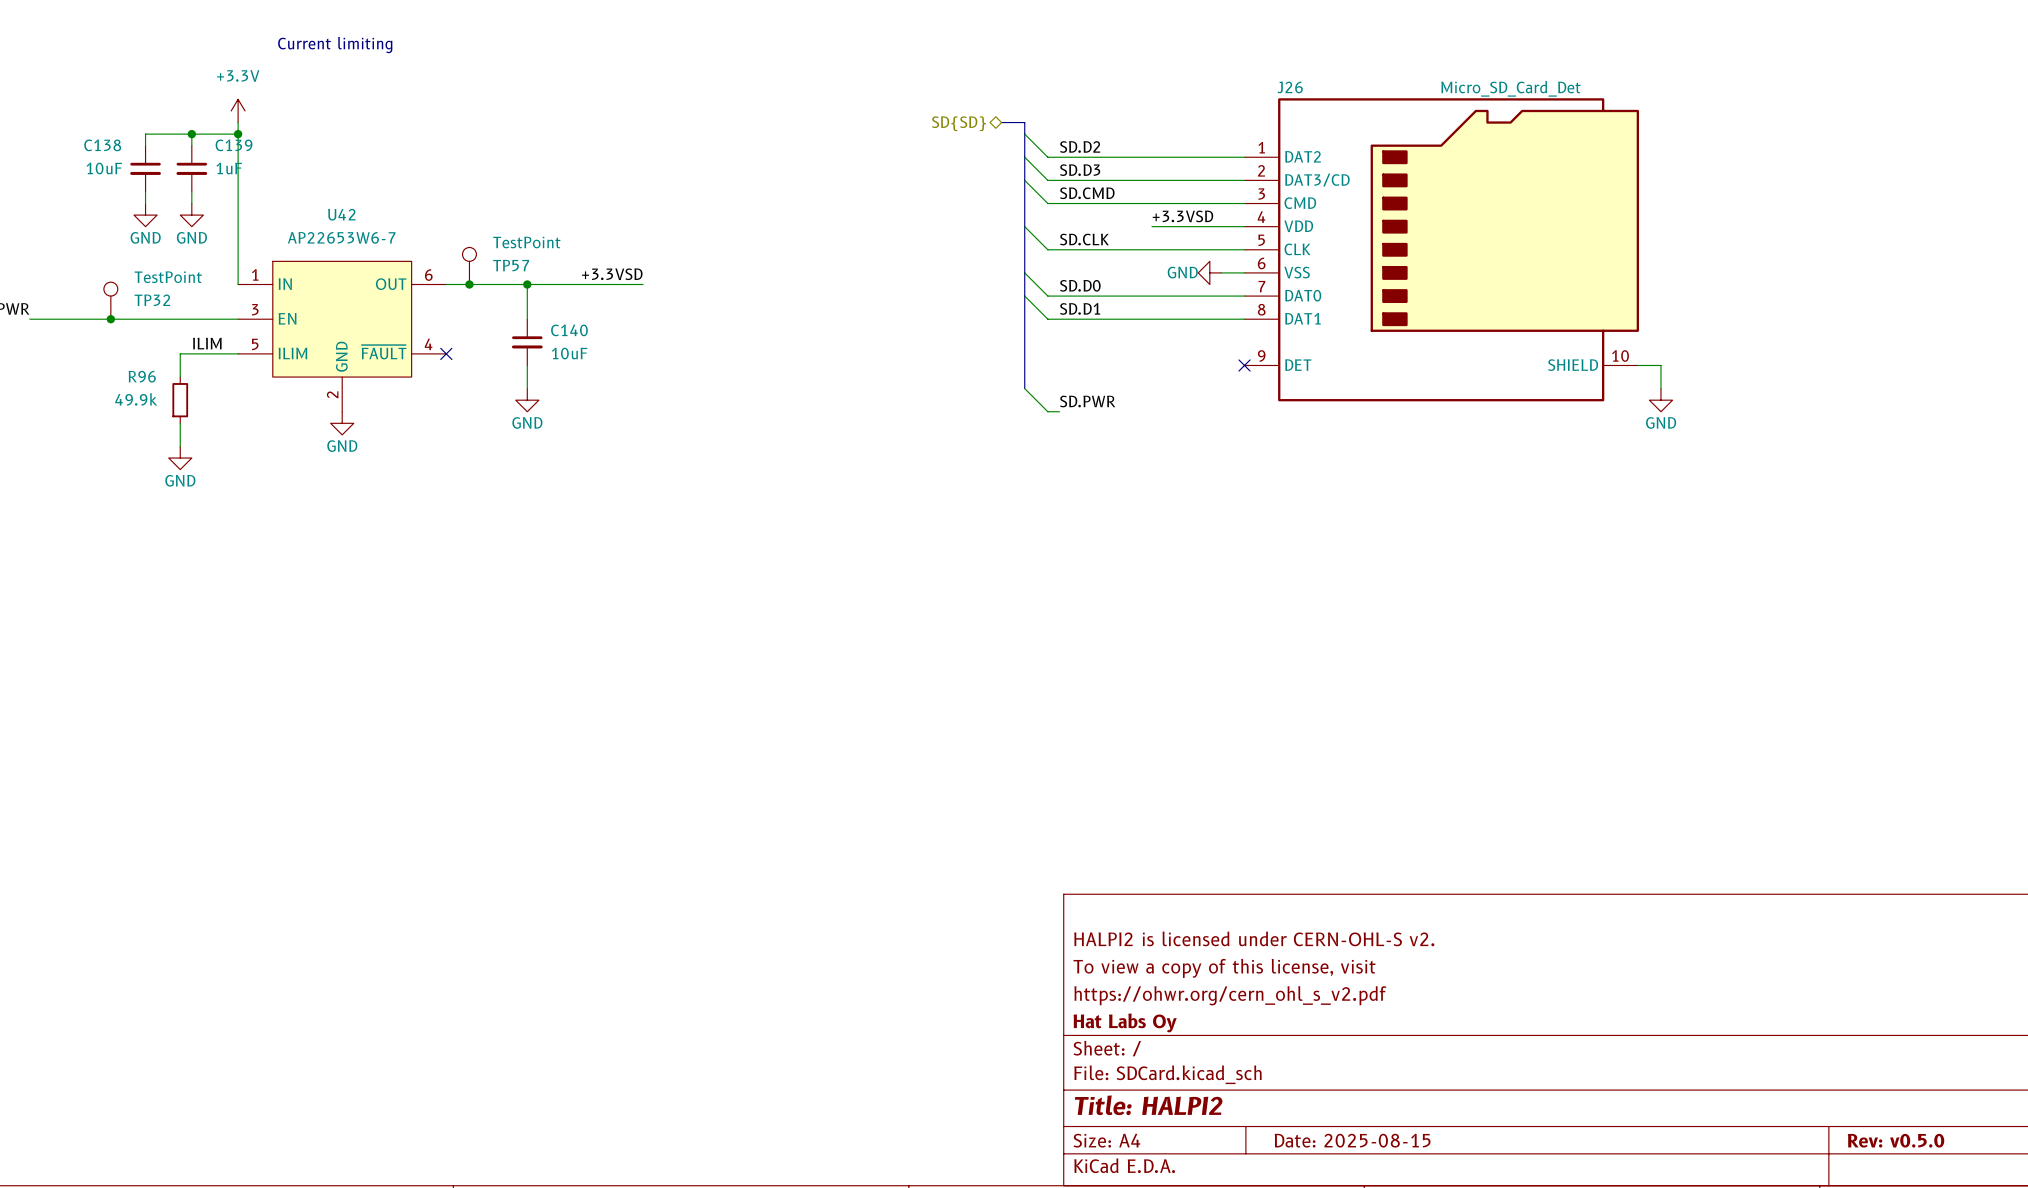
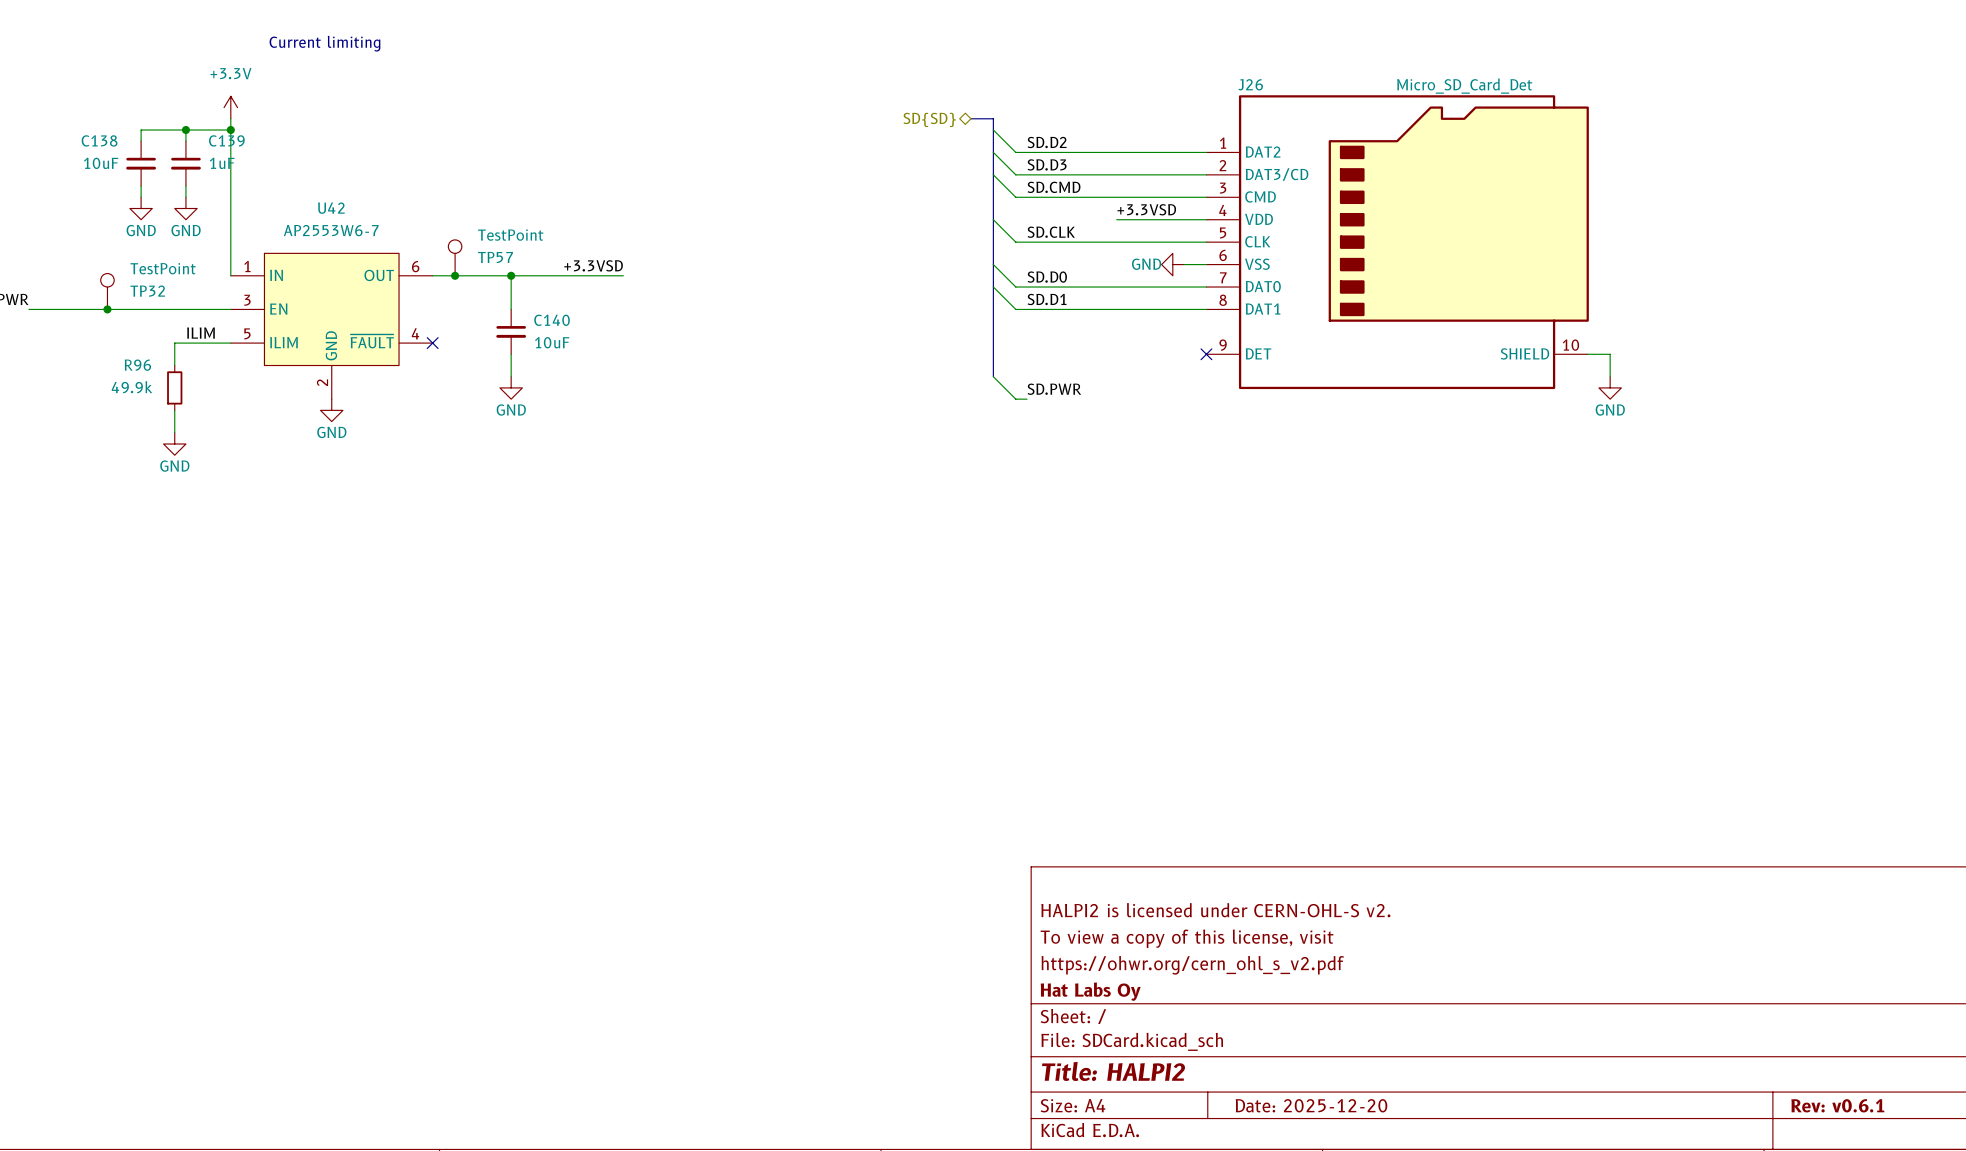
U42 value: AP22653W6-7 (341, 237) -> AP2553W6-7 (331, 230)
title block: Date: 2025-08-15 (1352, 1140) -> Date: 2025-12-20 (1311, 1105)
title block: Rev: v0.5.0 (1896, 1140) -> Rev: v0.6.1 (1837, 1105)

